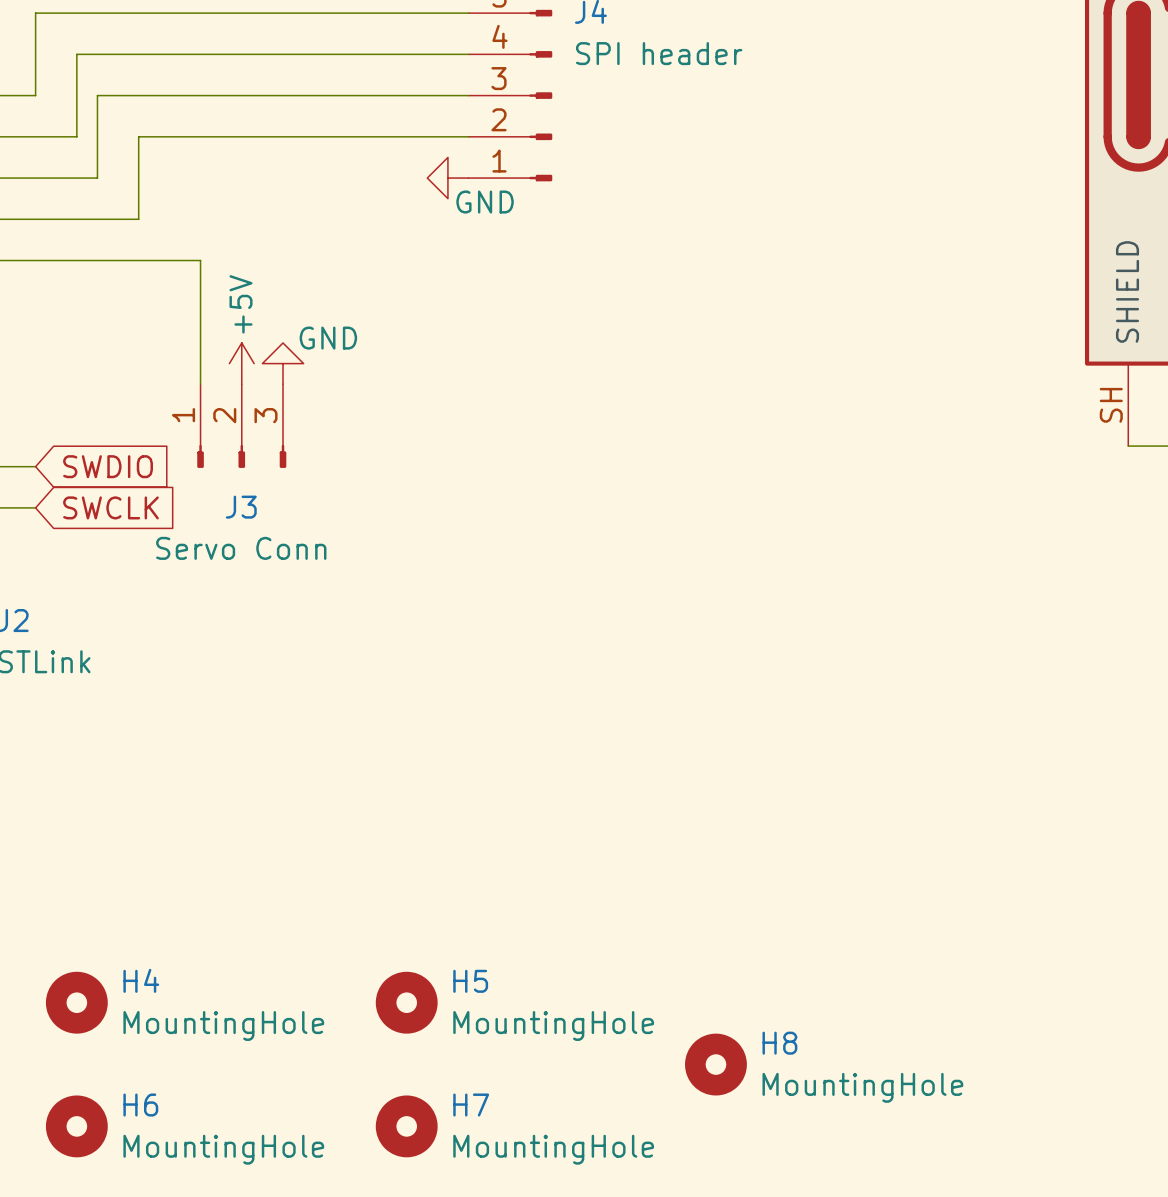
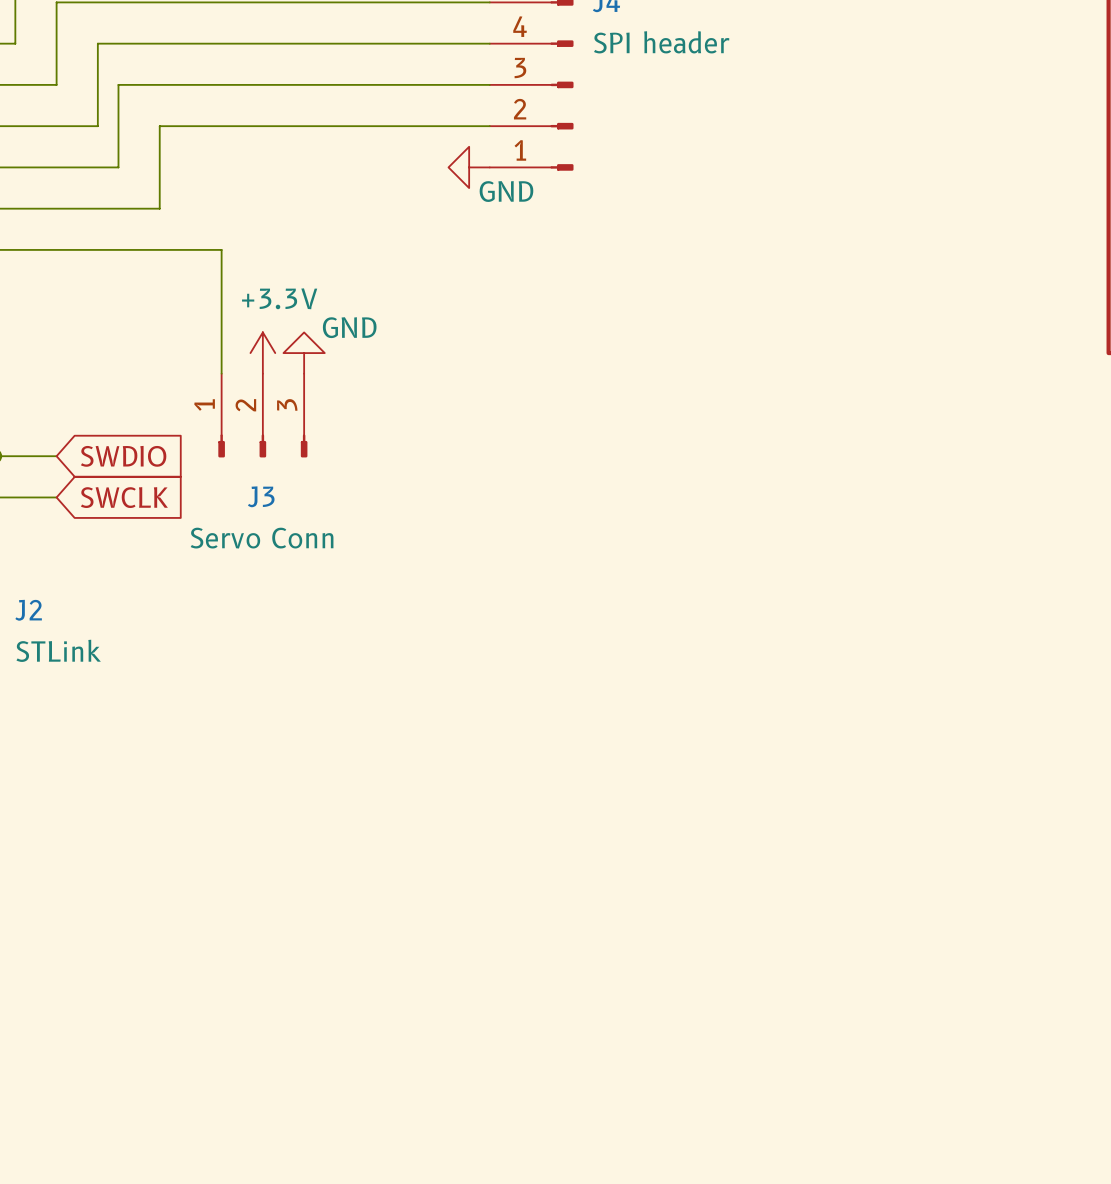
power symbol: +5V (241, 363) -> +3.3V (262, 353)
H4: MountingHole (76, 1002) -> none
H5: MountingHole (406, 1002) -> none
H8: MountingHole (715, 1064) -> none
H6: MountingHole (76, 1126) -> none
H7: MountingHole (406, 1126) -> none

